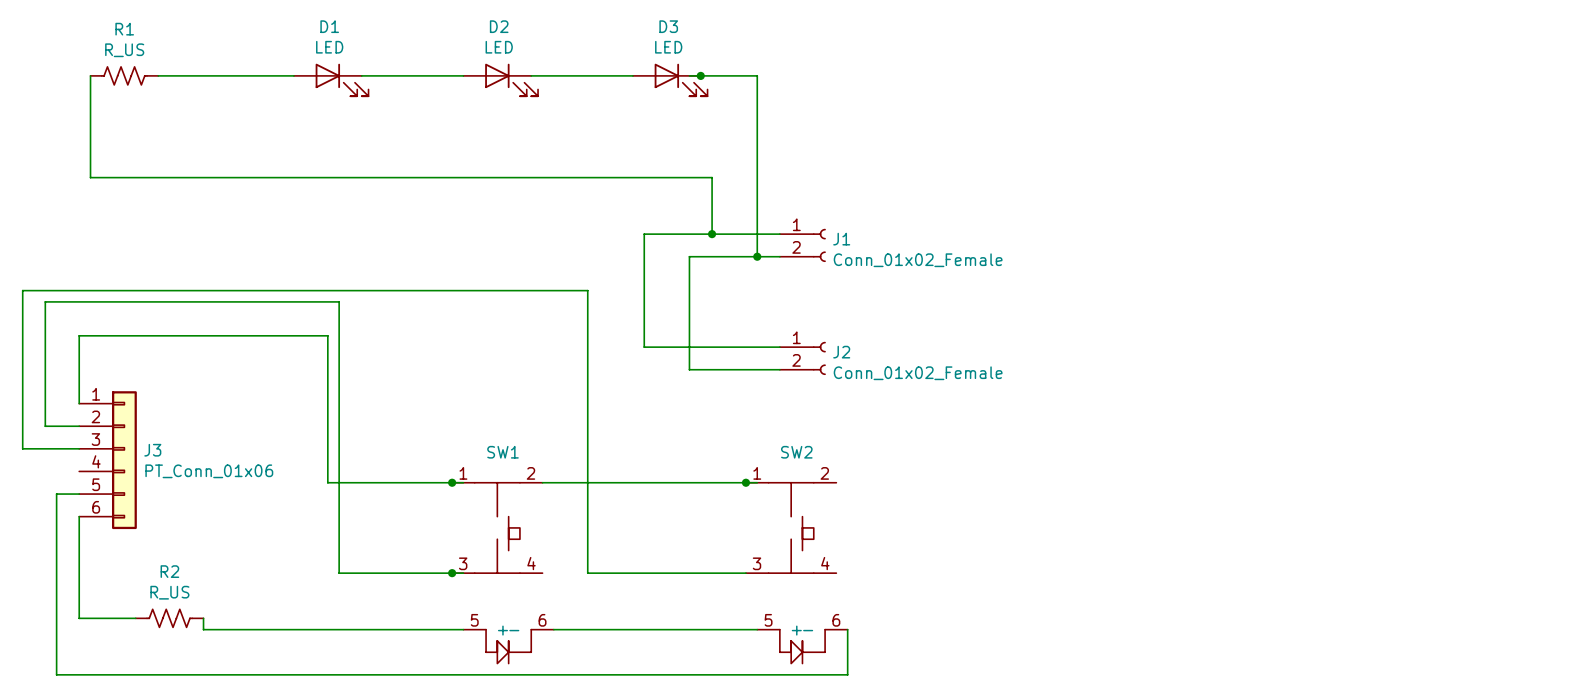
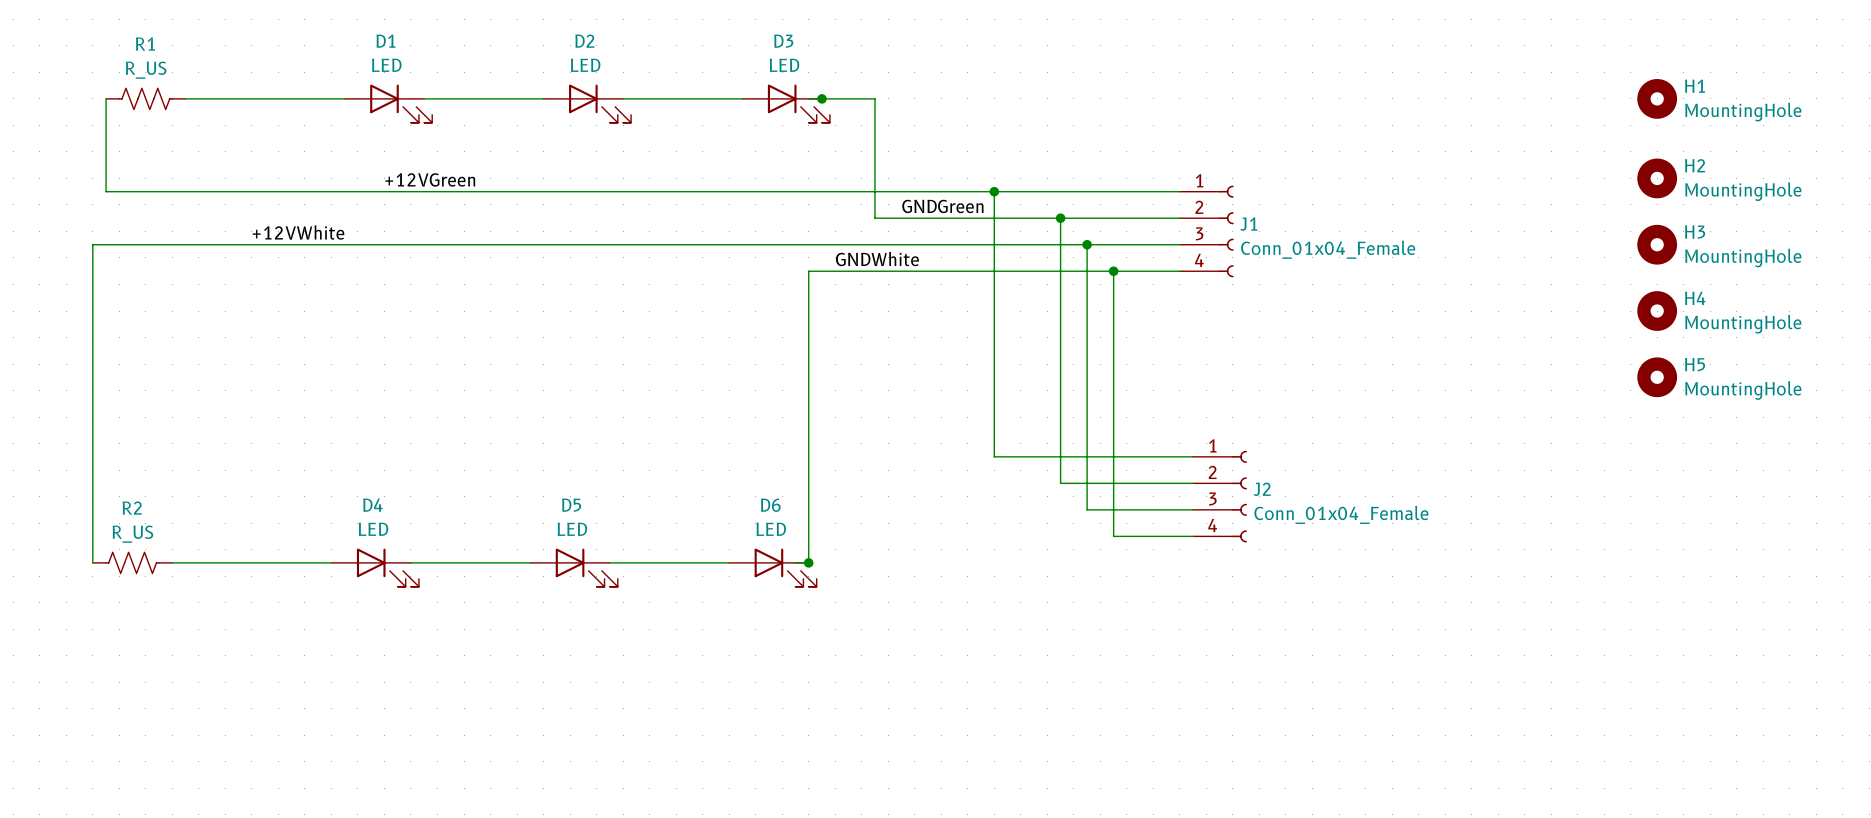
wire: (745, 75) (757, 75) (757, 256) -> (874, 98) (874, 218) (1179, 218)
H1: none -> MountingHole (1657, 98)
H2: none -> MountingHole (1657, 178)
label: none -> +12VGreen (430, 179)
wire: (90, 155) (90, 177) (712, 177) (712, 234) -> (106, 191) (1179, 191)
wire: none -> (994, 191) (994, 456) (1193, 456)
junction: none -> (994, 191)
label: none -> GNDGreen (942, 206)
wire: none -> (1060, 218) (1060, 483) (1193, 483)
junction: none -> (1060, 218)
label: none -> +12VWhite (298, 232)
wire: none -> (1087, 244) (1087, 509) (1193, 509)
junction: none -> (1087, 244)
H3: none -> MountingHole (1657, 244)
label: none -> GNDWhite (877, 259)
wire: none -> (1113, 271) (1113, 536) (1193, 536)
junction: none -> (1113, 271)
J1 symbol: [779, 228, 826, 262] -> [1179, 185, 1234, 278]
junction: (712, 234) -> none
wire: (779, 234) (644, 234) (644, 347) (779, 347) -> none
wire: (689, 256) (779, 256) -> (808, 311) (808, 271) (1179, 271)
junction: (757, 256) -> none
H4: none -> MountingHole (1657, 311)
J1 value: Conn_01x02_Female (918, 260) -> Conn_01x04_Female (1328, 249)
H5: none -> MountingHole (1657, 377)
wire: (79, 335) (327, 335) (327, 482) (463, 482) -> (92, 403) (92, 244) (1179, 244)
J2 symbol: [779, 341, 826, 375] -> [1193, 450, 1247, 543]
wire: (689, 369) (779, 369) -> (808, 443) (808, 562) (795, 562)
J2 value: Conn_01x02_Female (918, 373) -> Conn_01x04_Female (1341, 514)
wire: none -> (92, 483) (92, 562)
wire: (79, 426) (45, 426) (45, 301) (339, 301) (339, 573) (463, 573) -> none
wire: (79, 448) (22, 448) (22, 290) (587, 290) (587, 573) (745, 573) -> none
J3: PT_Conn_01x06 (108, 460) -> none
wire: none -> (172, 562) (331, 562)
wire: none -> (410, 562) (530, 562)
wire: none -> (609, 562) (729, 562)
junction: none -> (808, 562)
D4: none -> LED (375, 567)
D5: none -> LED (574, 567)
D6: none -> LED (772, 567)
junction: (452, 482) -> none
wire: (542, 482) (757, 482) -> none
junction: (745, 482) -> none
wire: (79, 494) (56, 494) (56, 674) (847, 674) (847, 629) -> none
wire: (79, 516) (79, 618) (135, 618) -> none
junction: (452, 573) -> none
SW1: (502, 573) -> none
SW2: (796, 573) -> none
R2 position: (169, 618) -> (132, 562)
wire: (203, 618) (203, 629) (463, 629) -> none
wire: (553, 629) (757, 629) -> none

